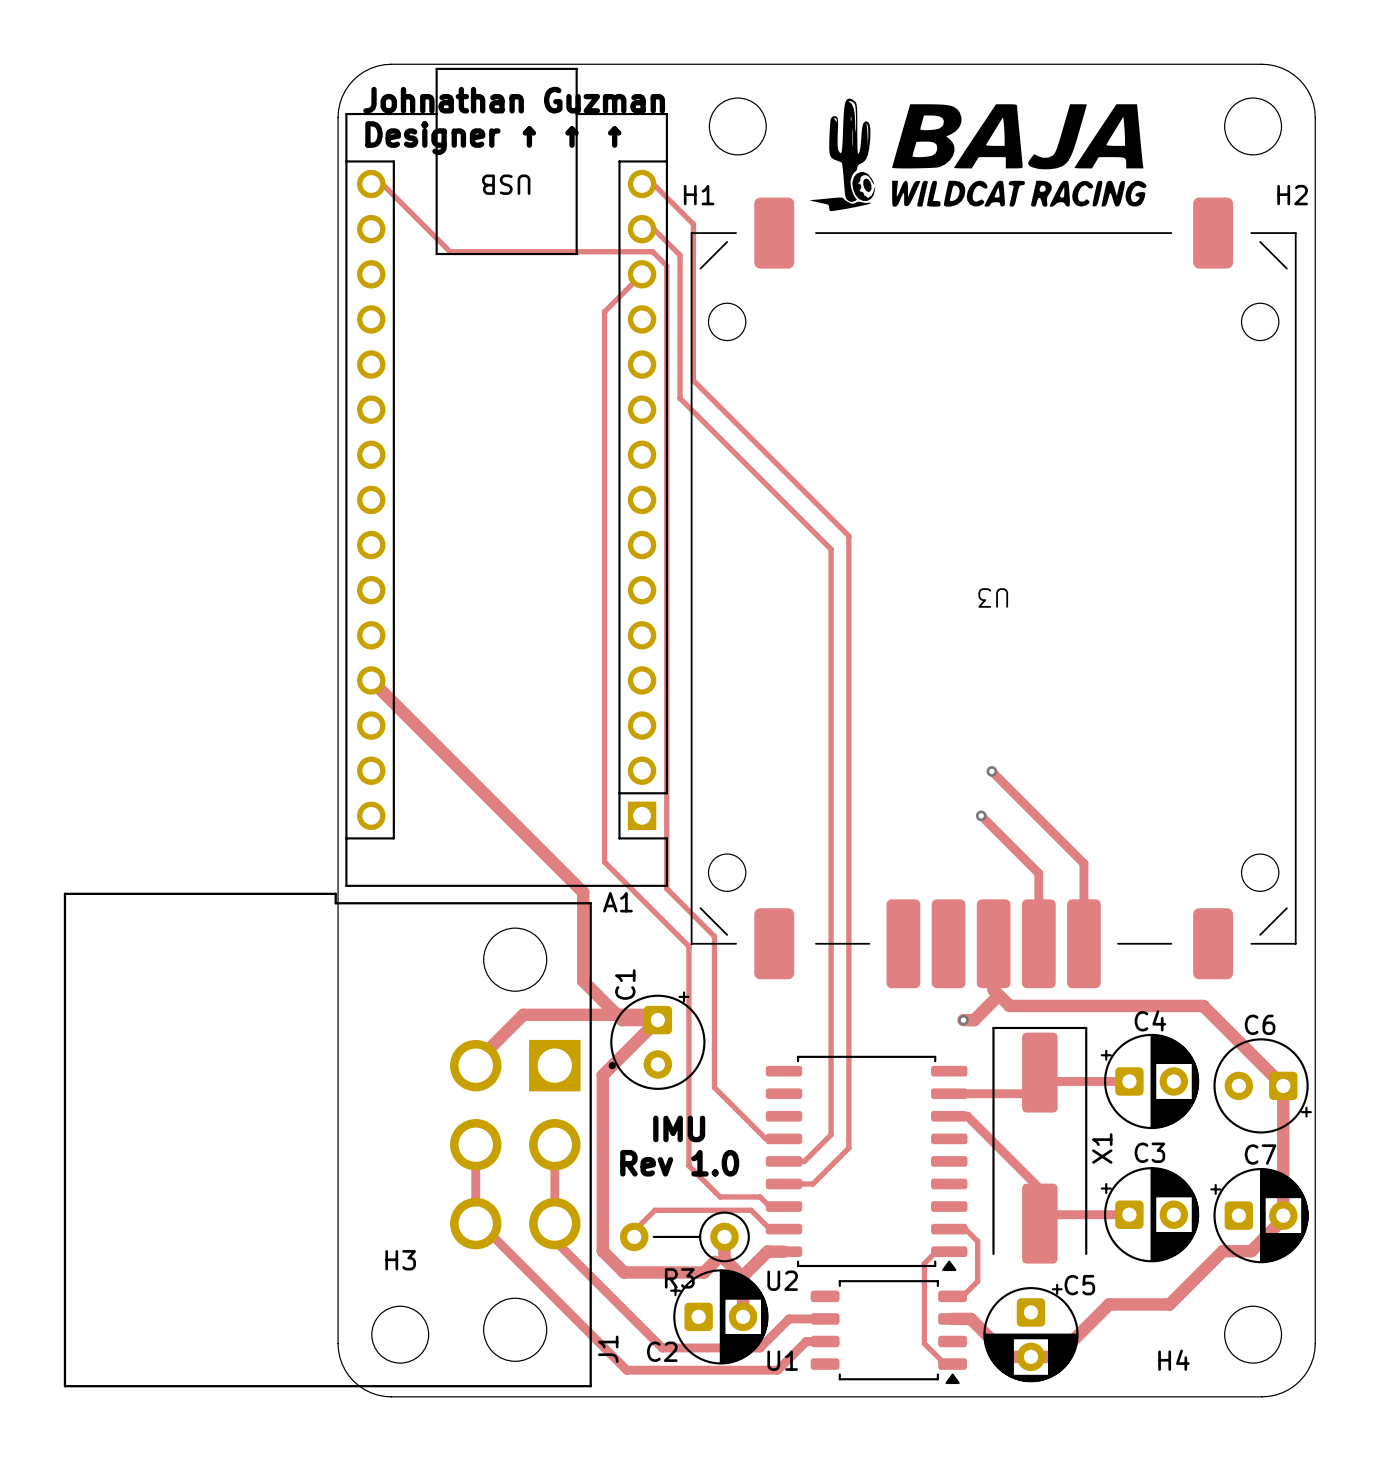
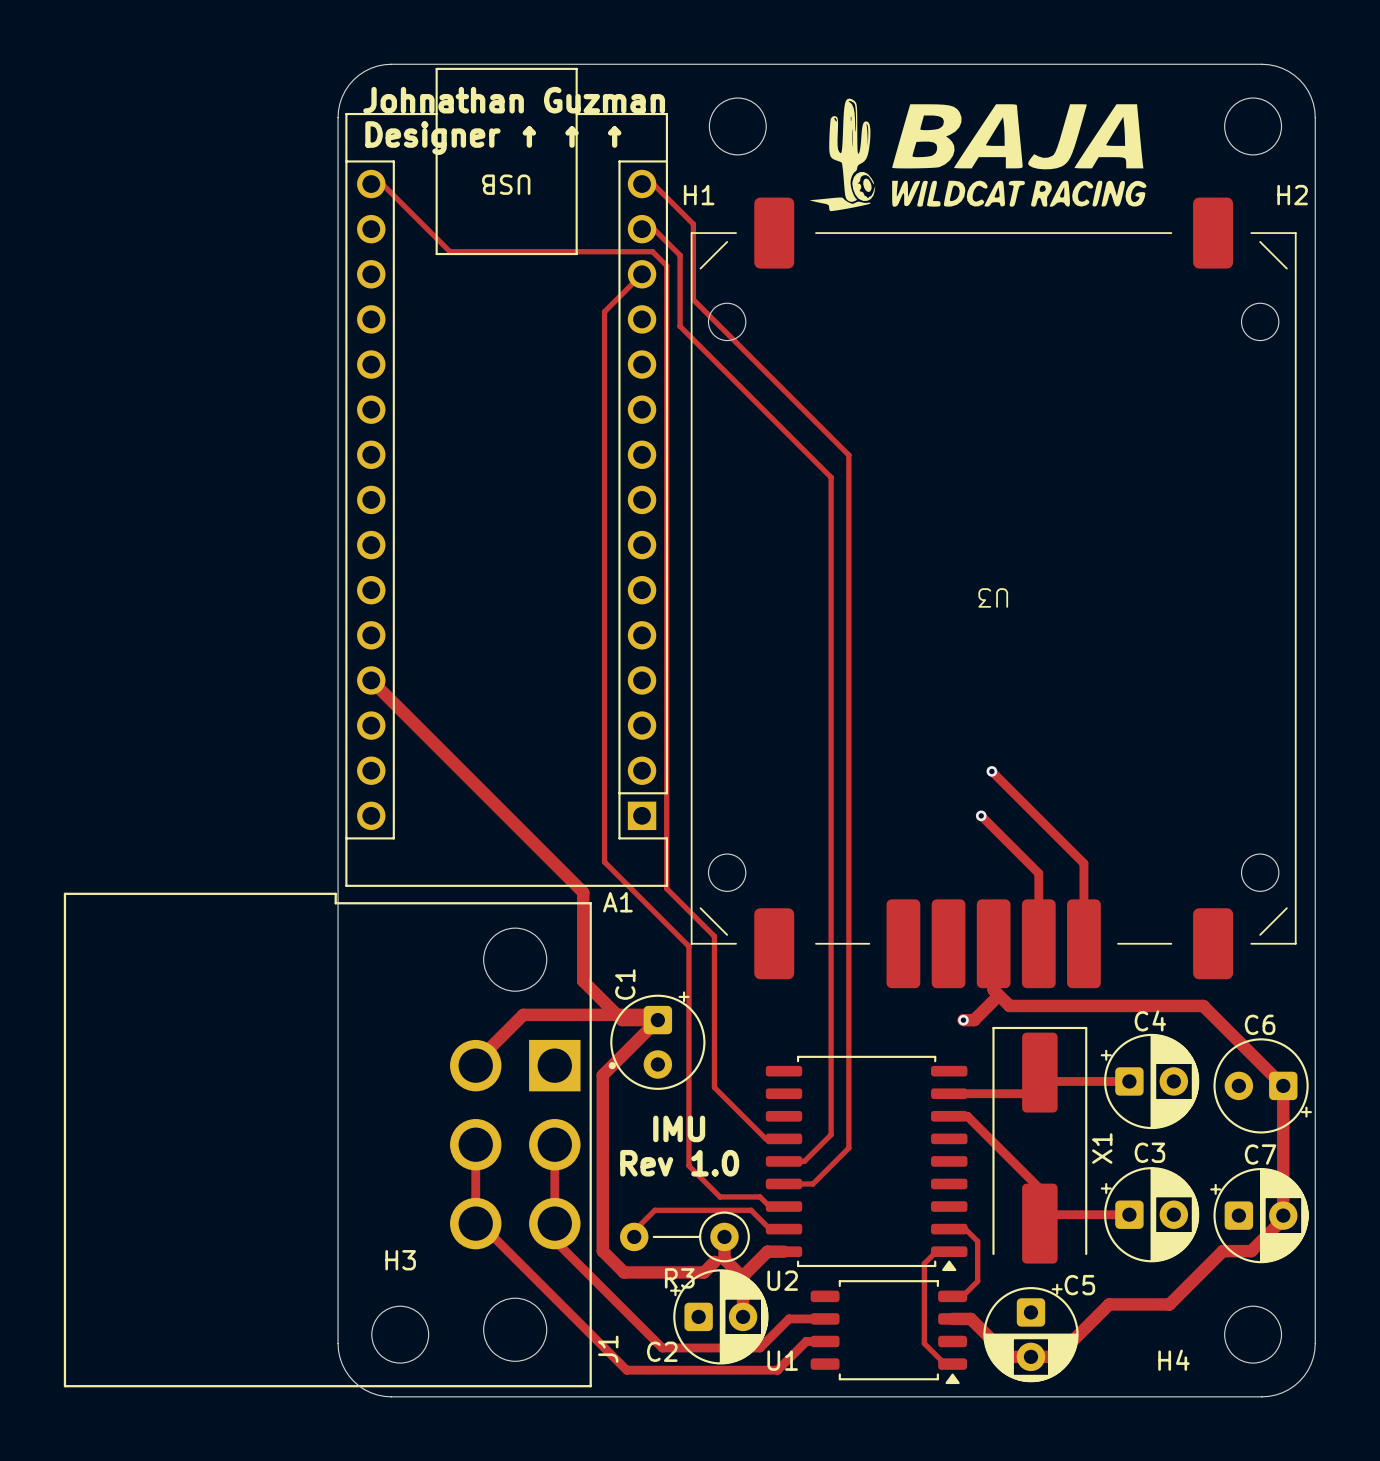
track: (693, 299) (693, 380) (848, 536) -> (693, 299) (848, 455) (848, 536)
track: (680, 326) (680, 398) (831, 549) -> (680, 326) (831, 477) (831, 549)

